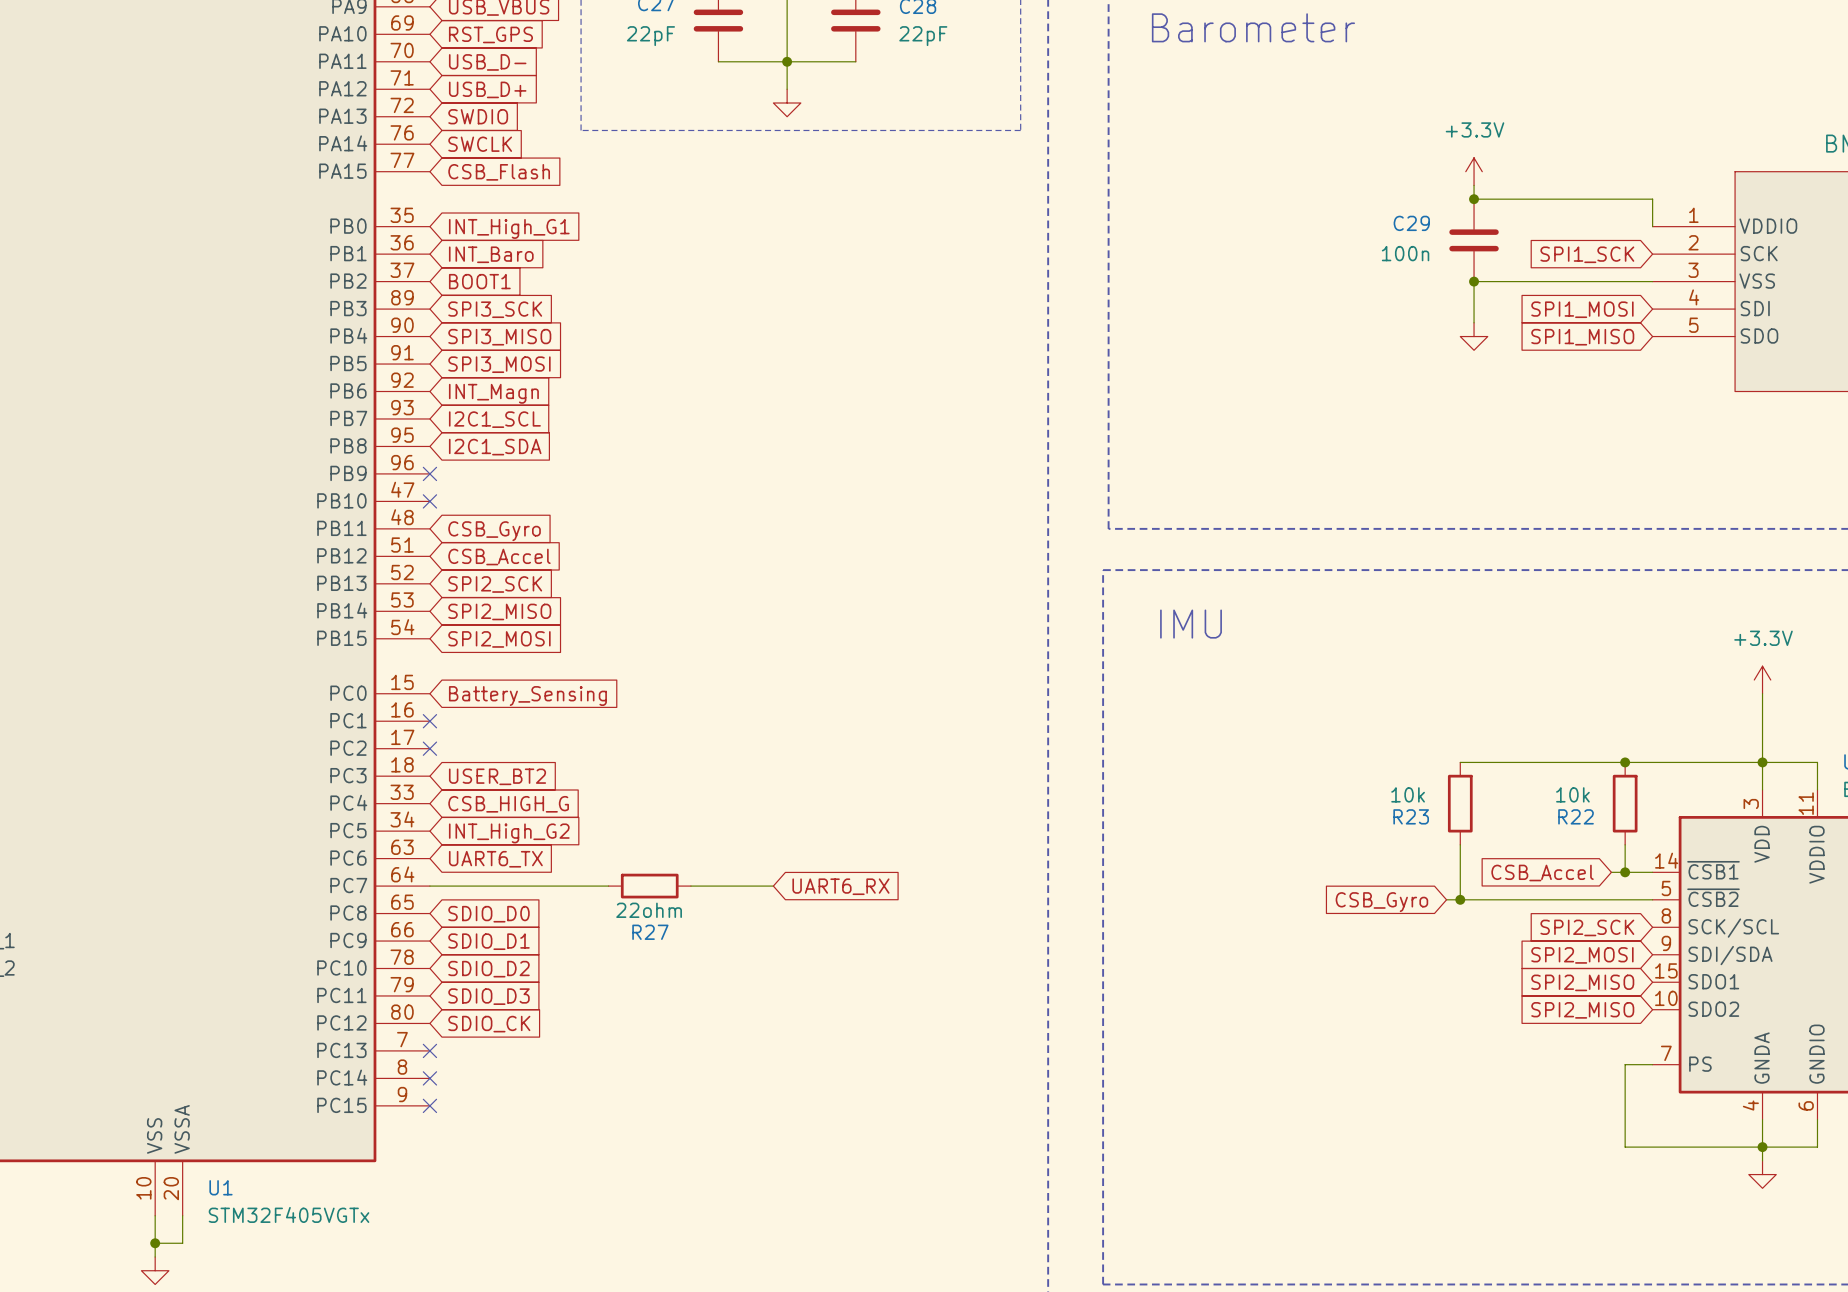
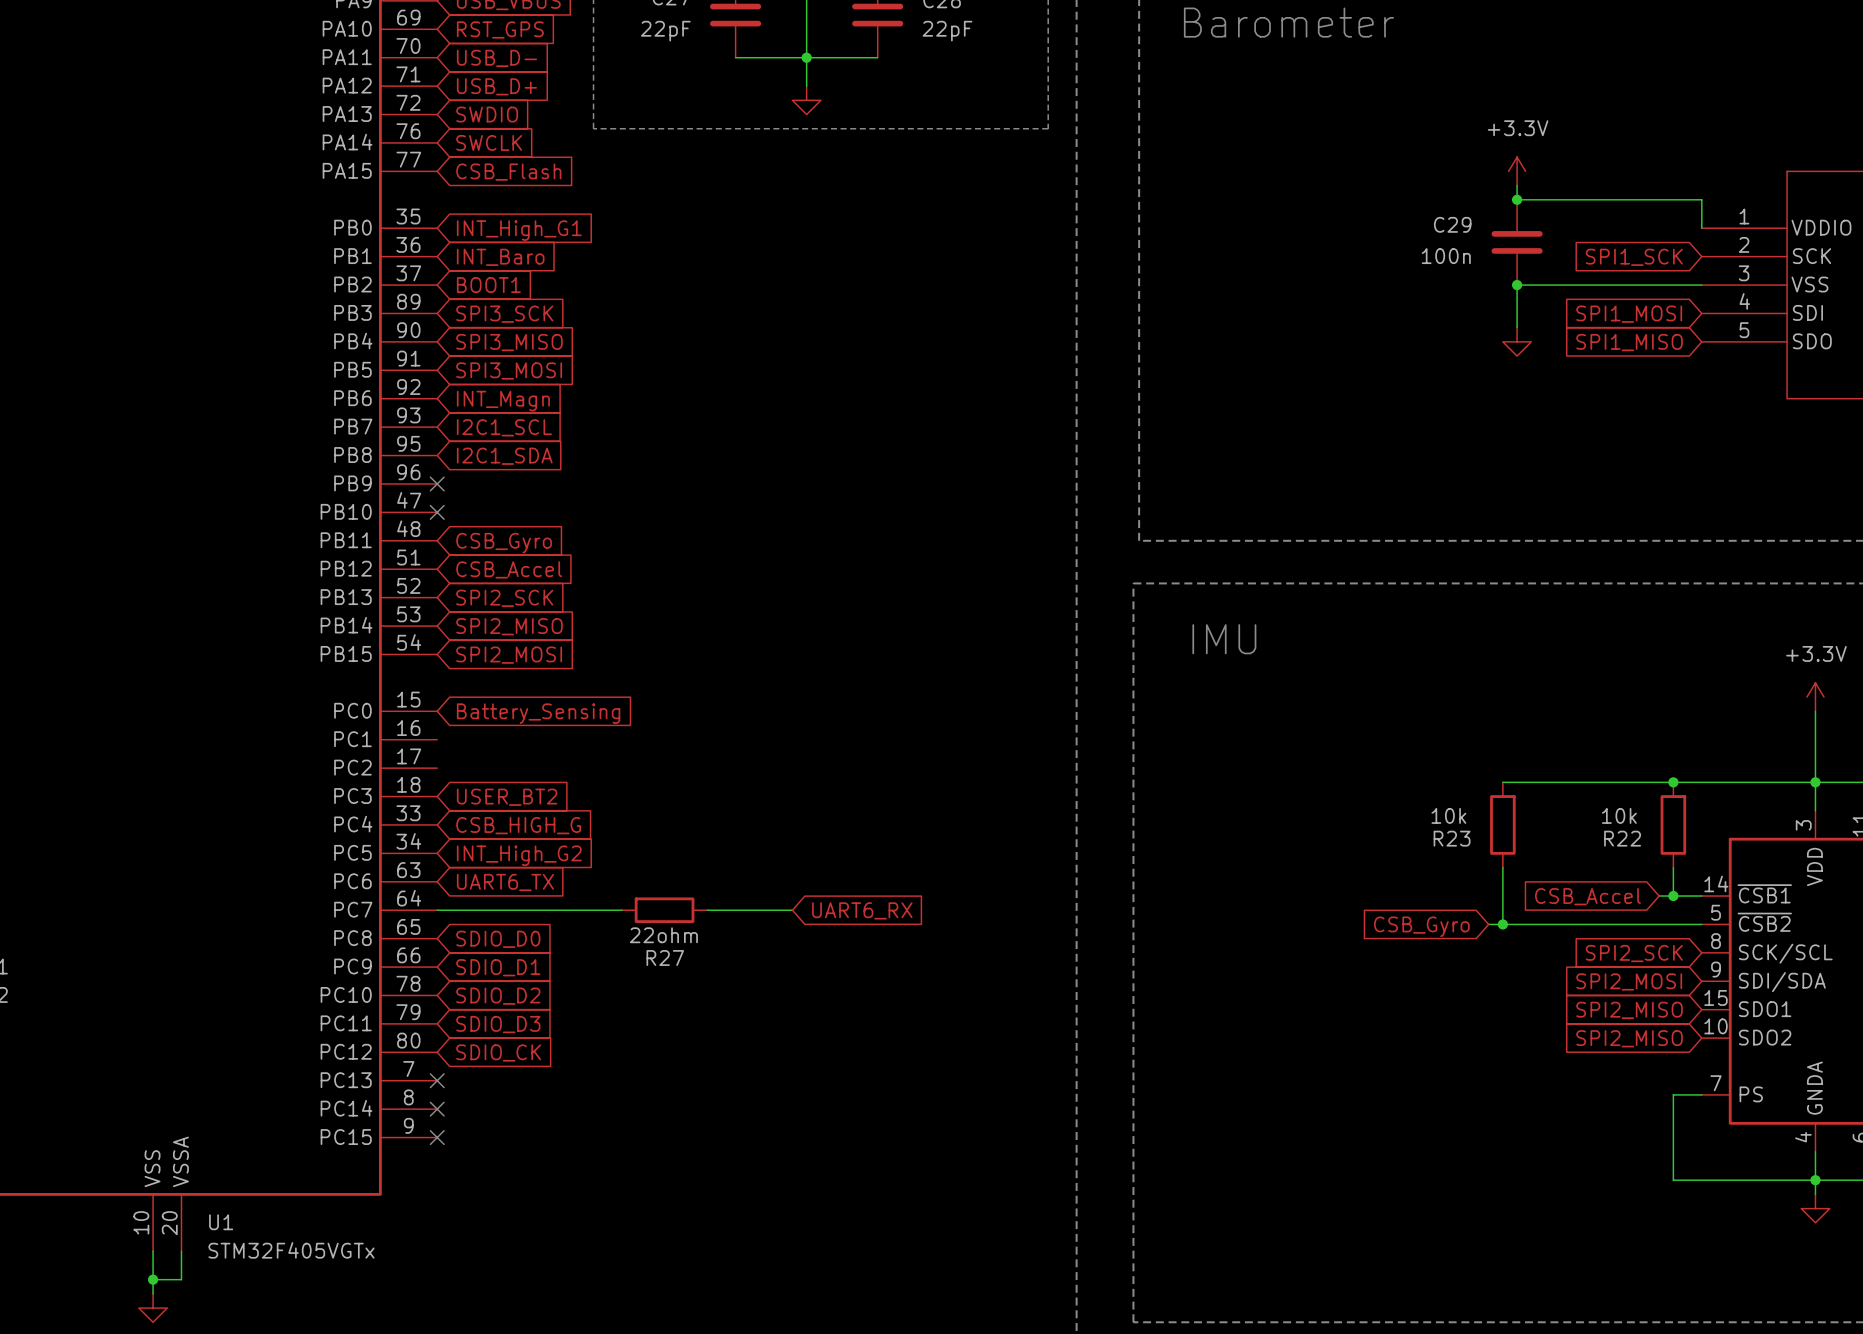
no-connect mark: (429, 721) -> none
no-connect mark: (429, 748) -> none

